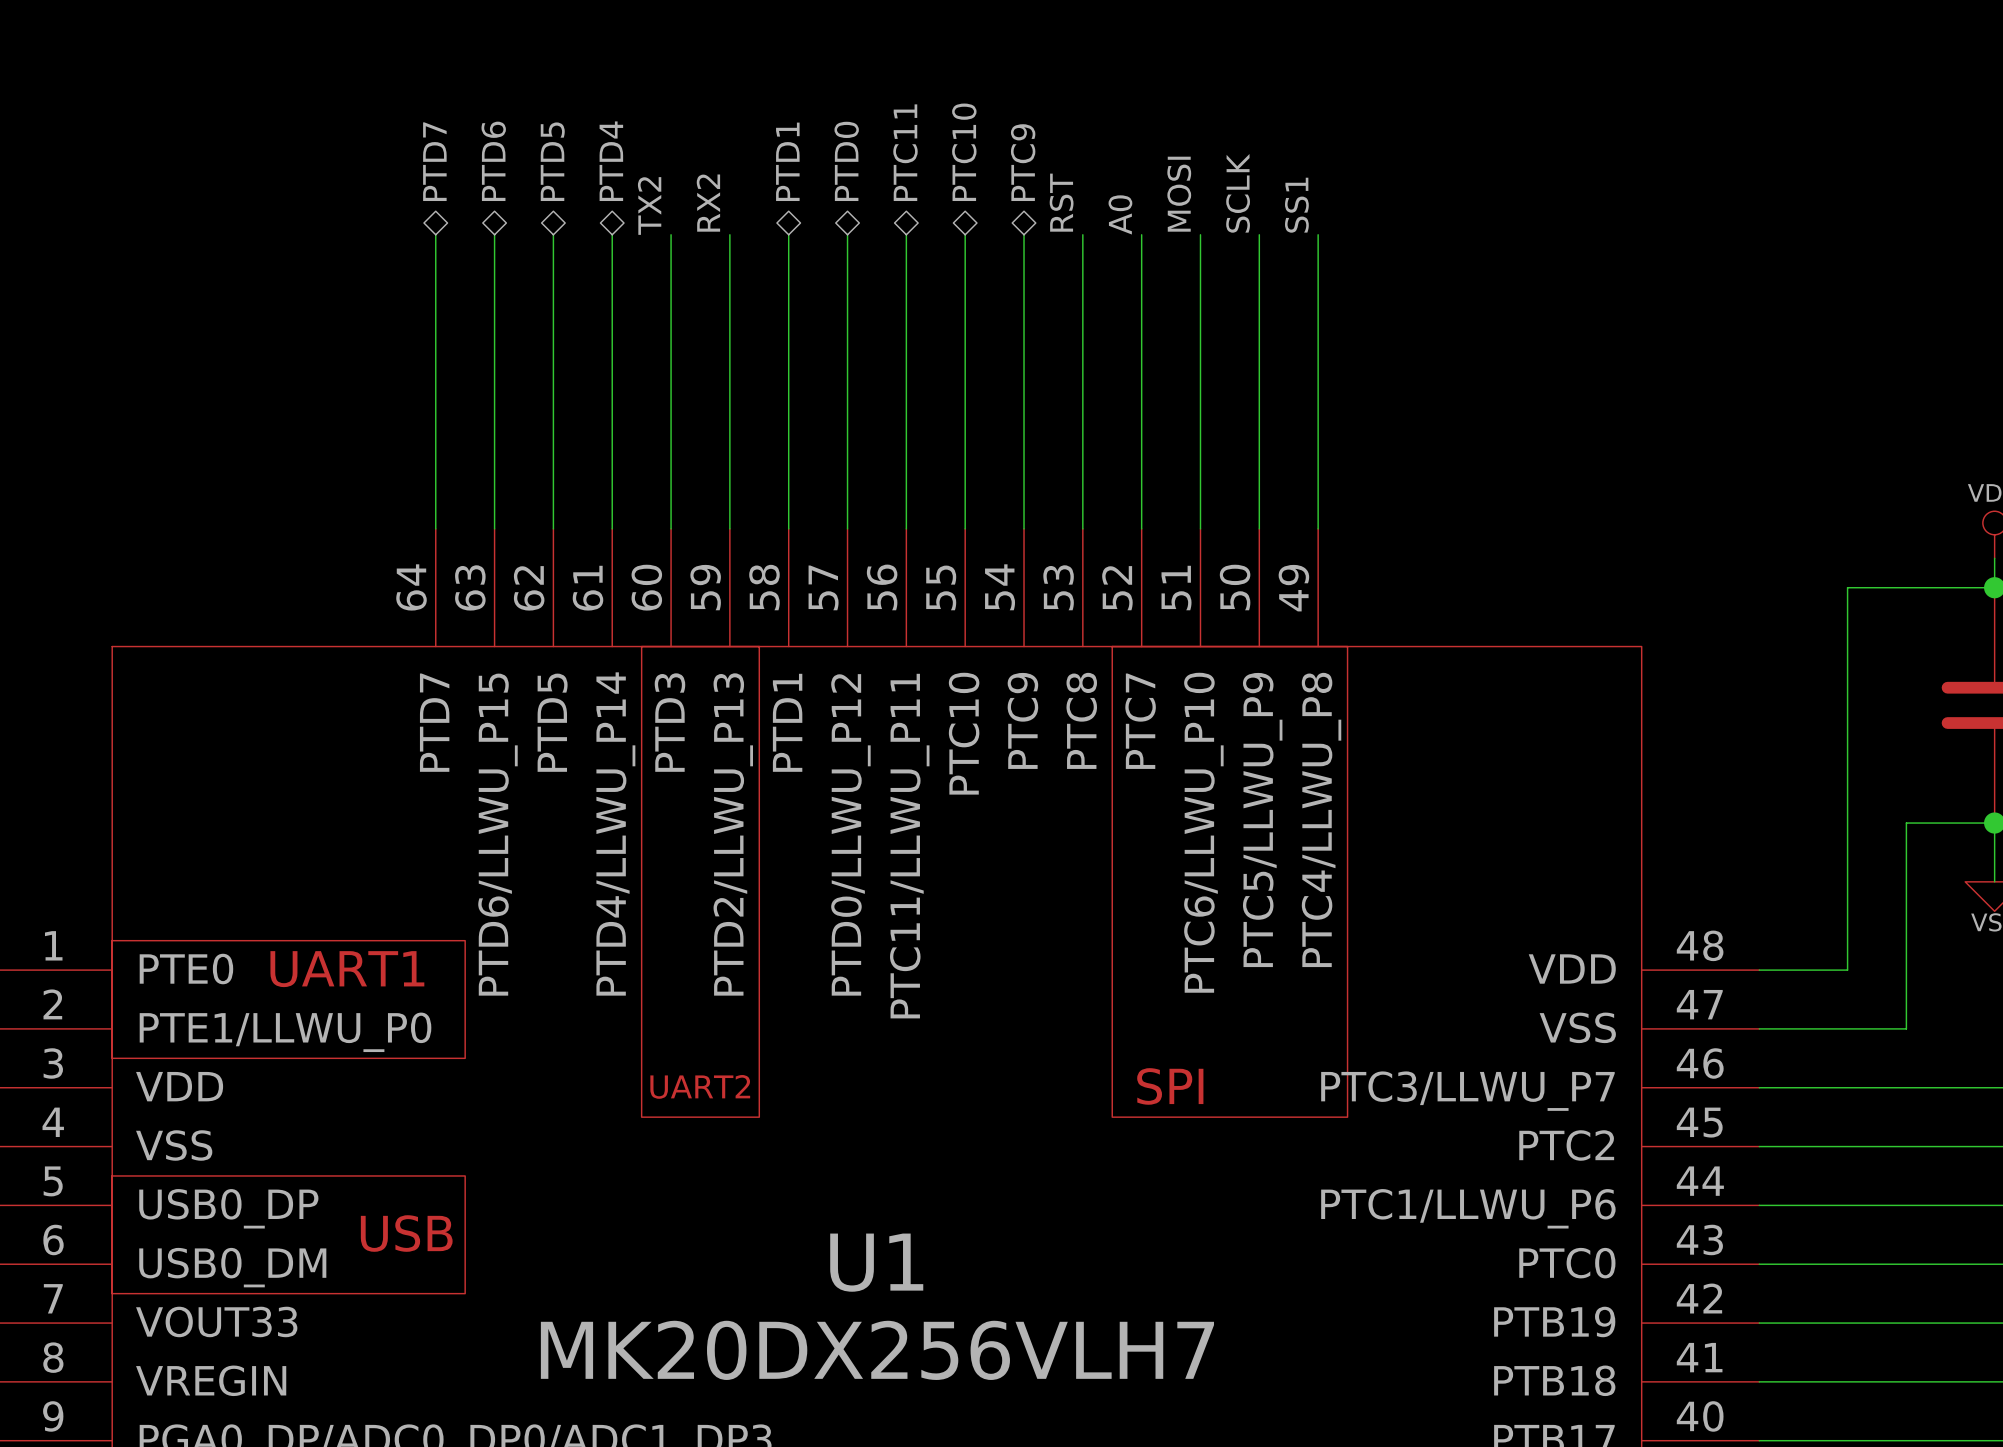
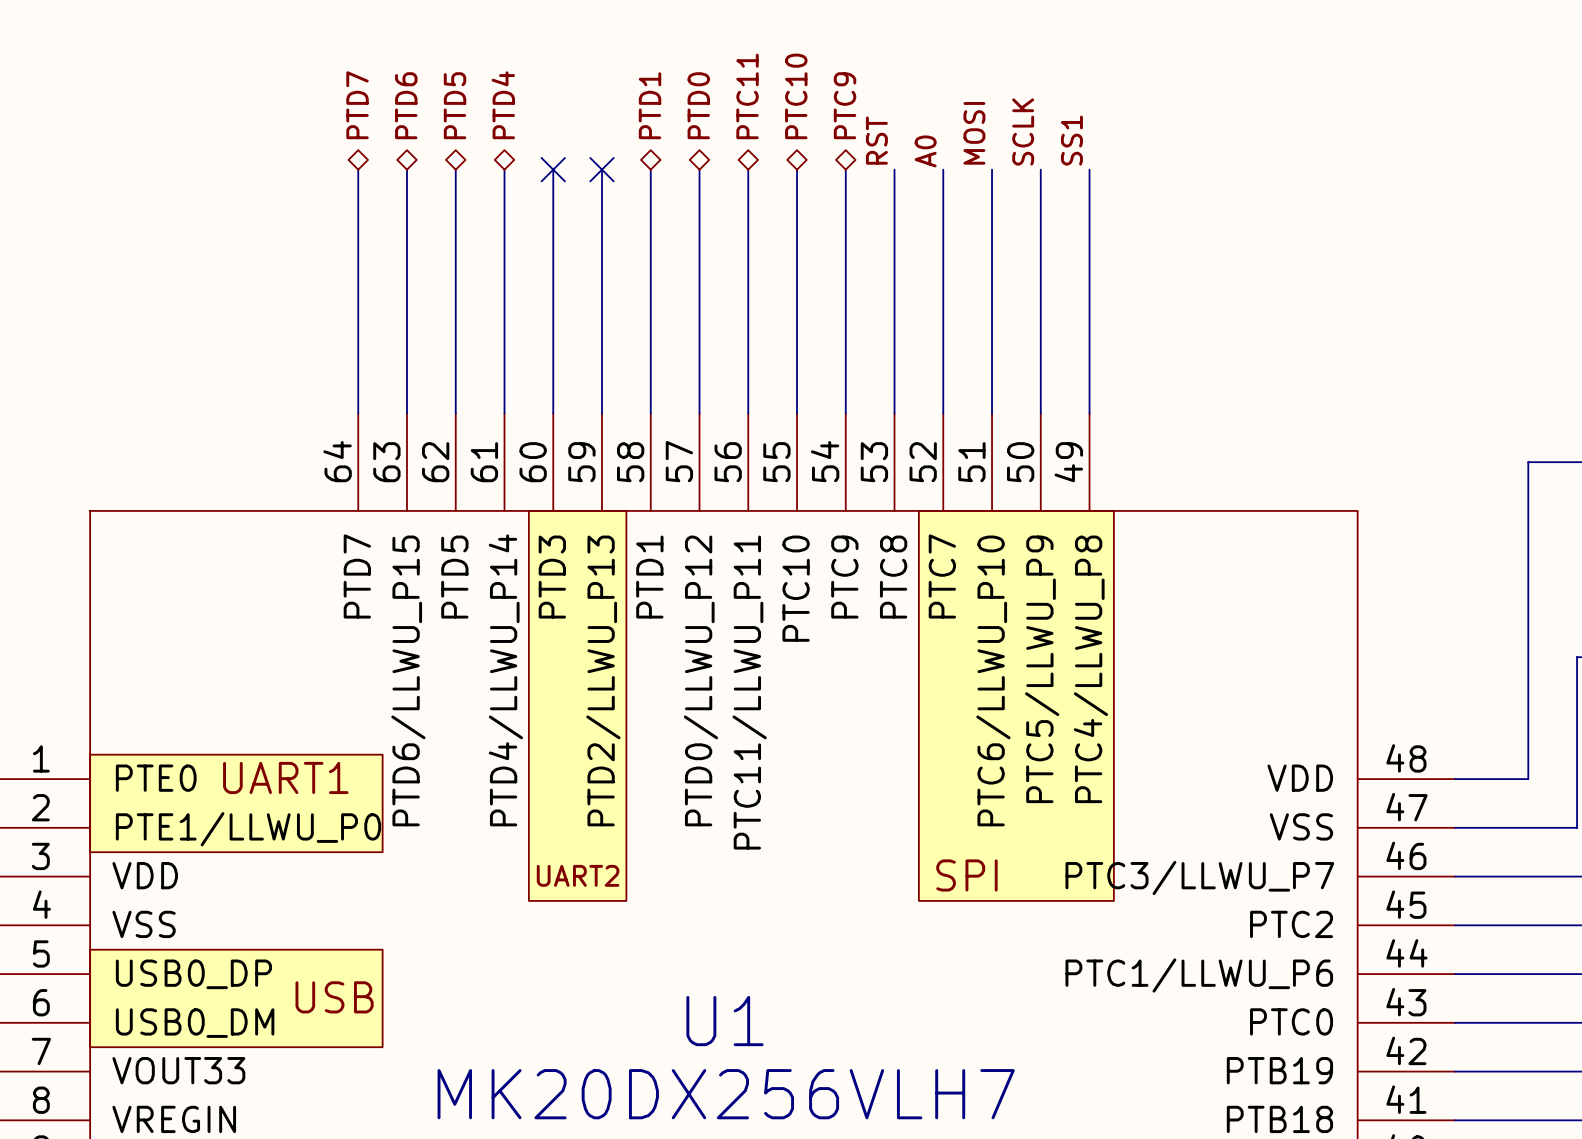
label: RX2 (708, 203) -> none
label: TX2 (649, 205) -> none
no-connect mark: none -> (553, 169)
no-connect mark: none -> (602, 169)

